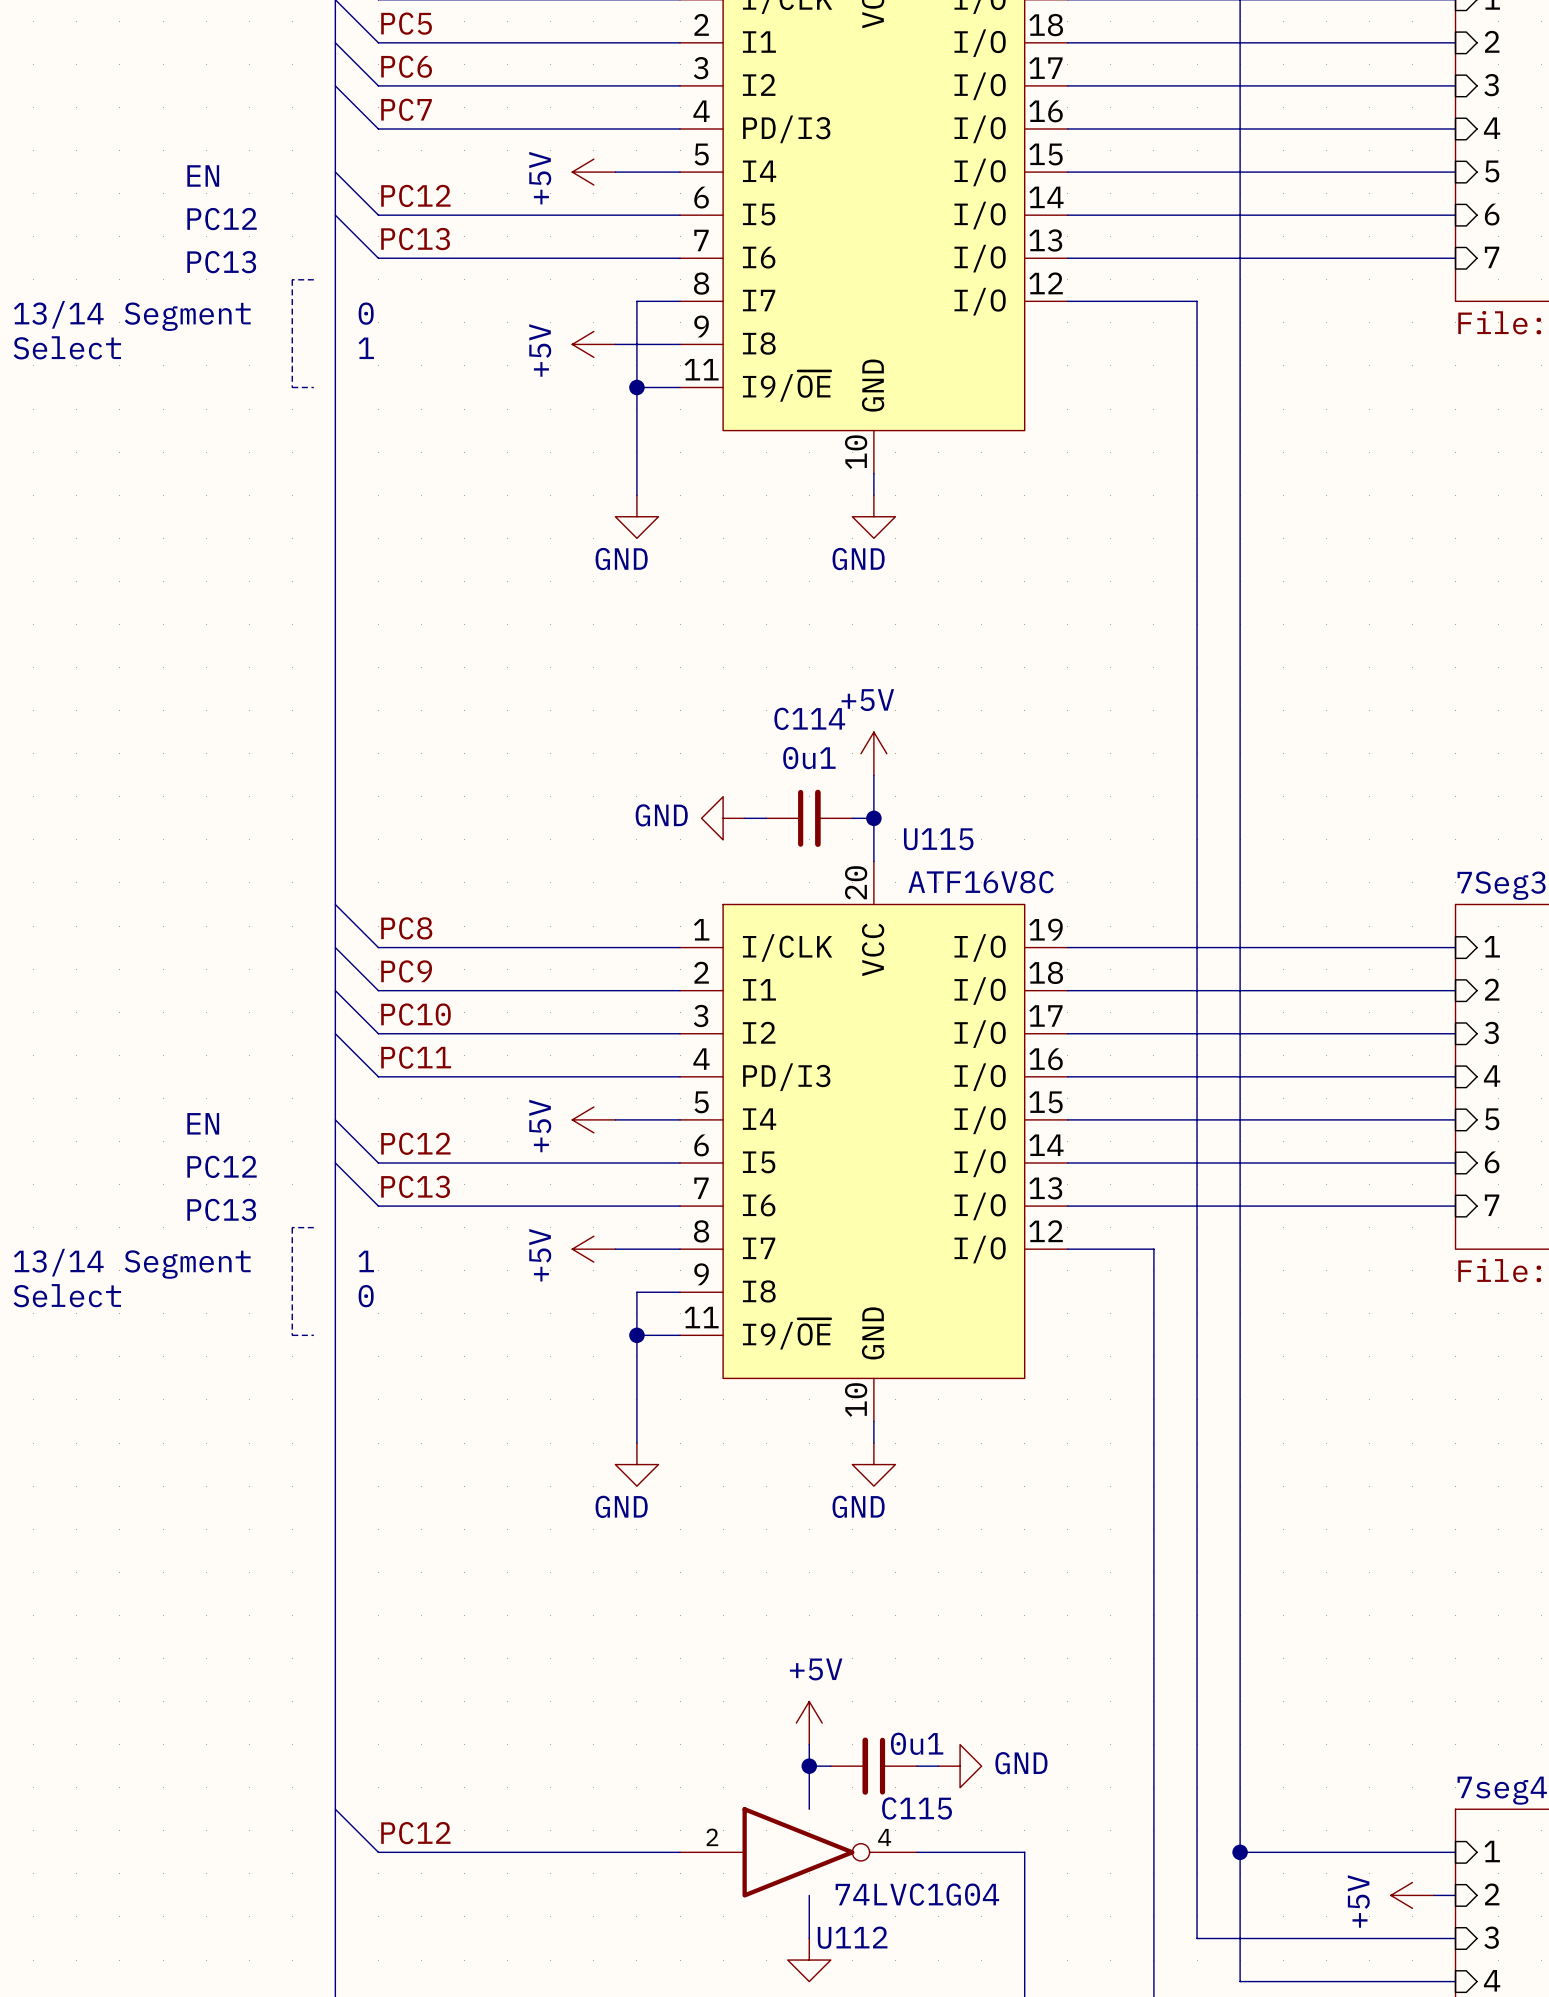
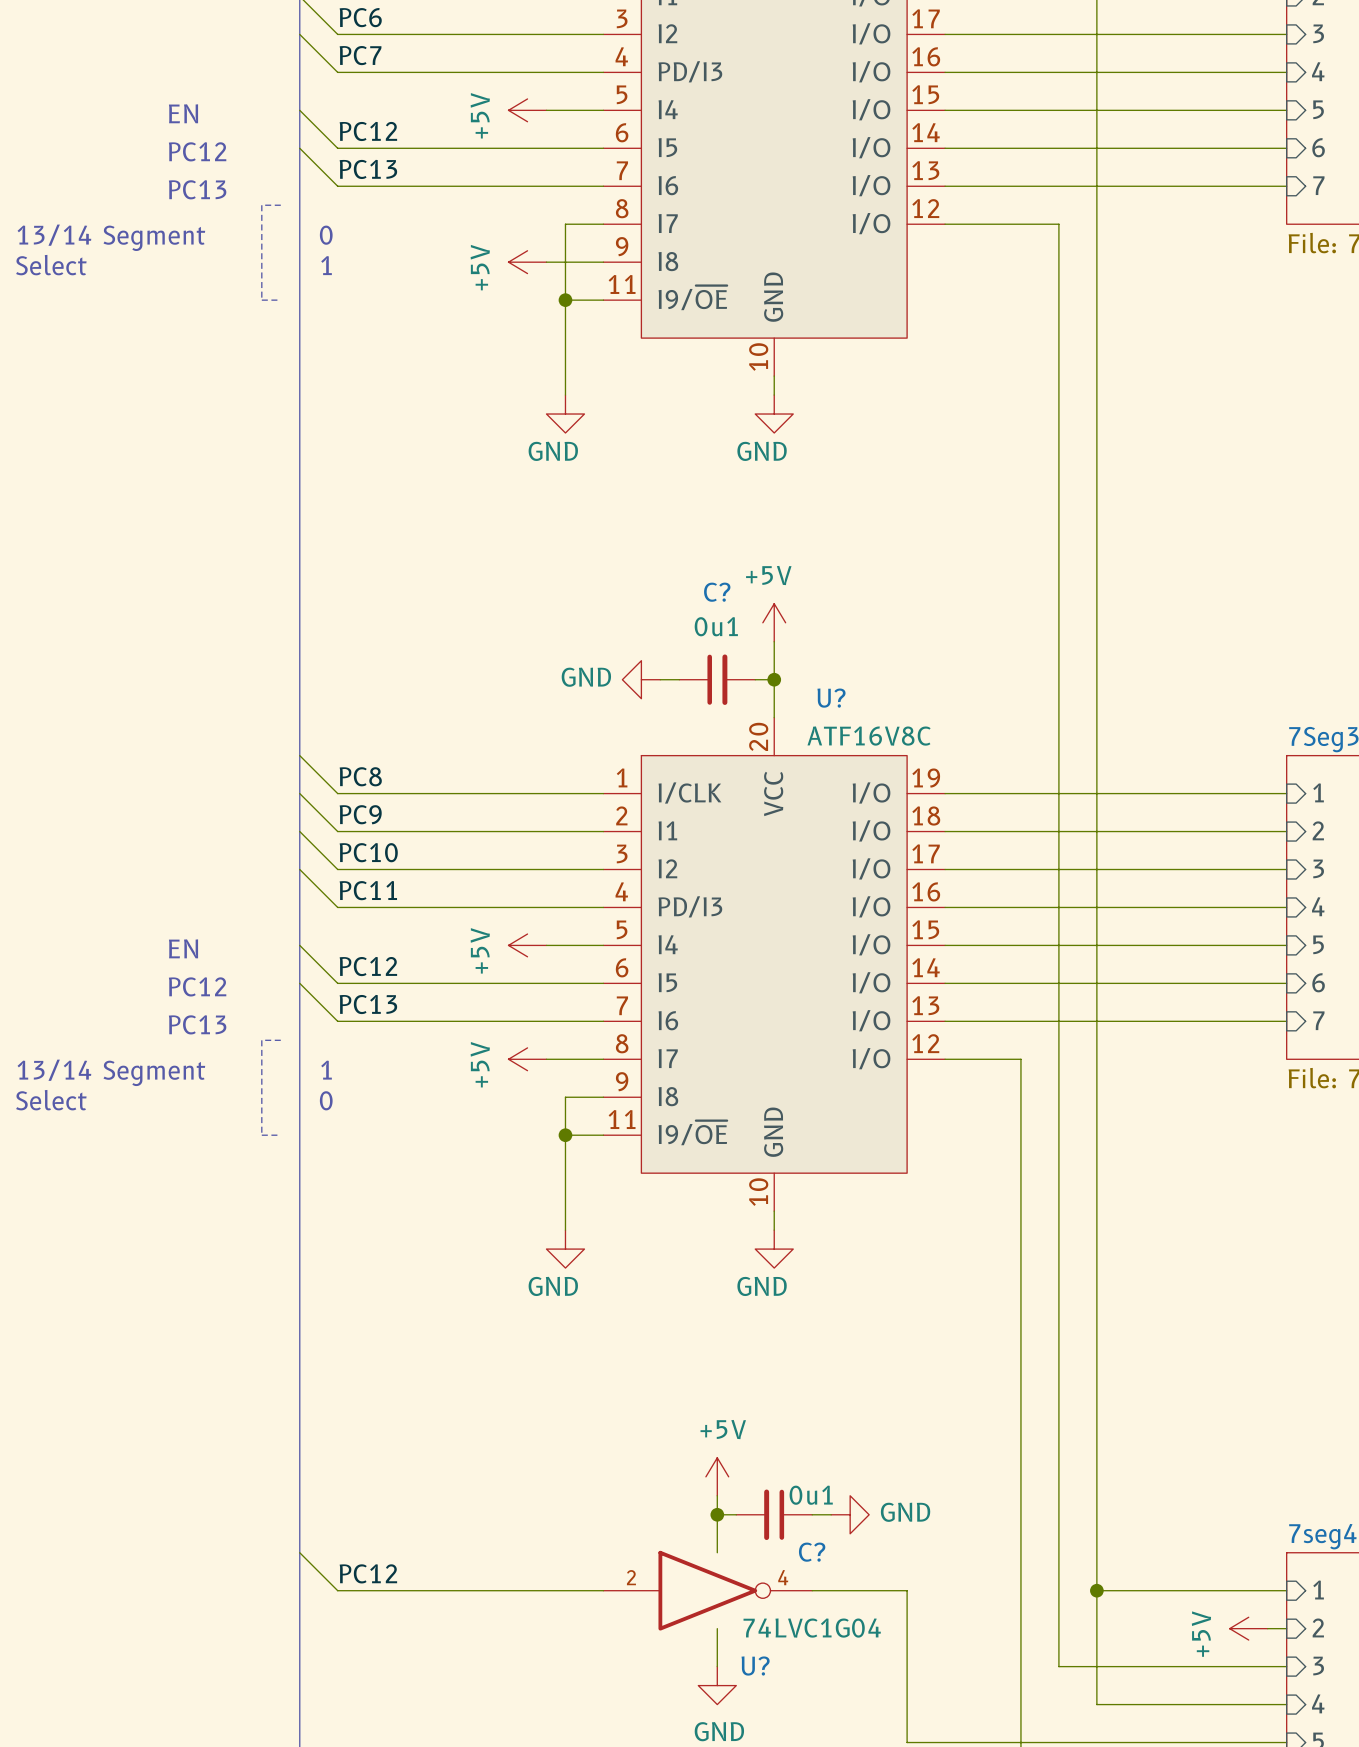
C114 name: C114 (809, 718) -> C? (717, 592)
U115 name: U115 (938, 839) -> U? (831, 698)
C115 name: C115 (917, 1808) -> C? (812, 1552)
U112 name: U112 (852, 1937) -> U? (755, 1666)

